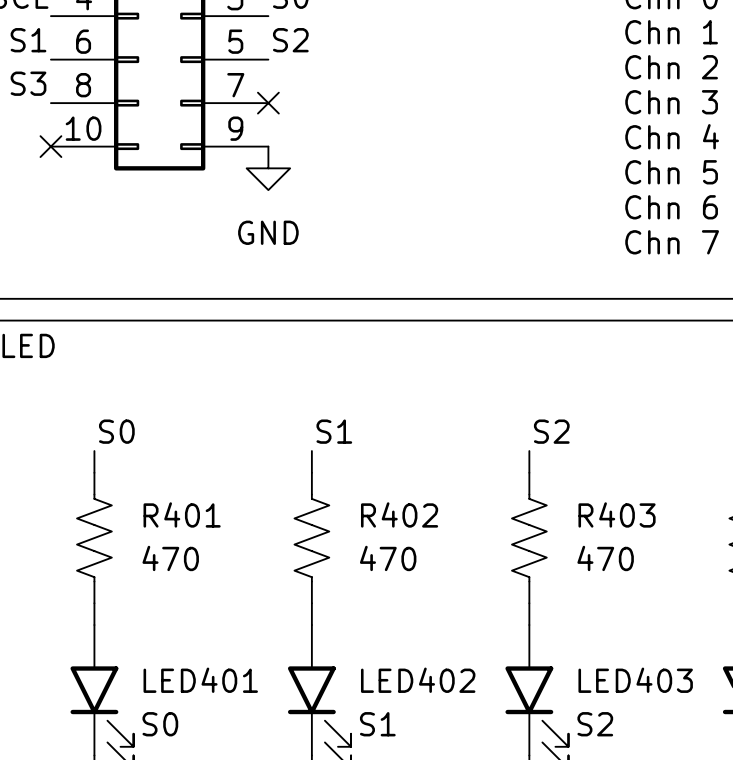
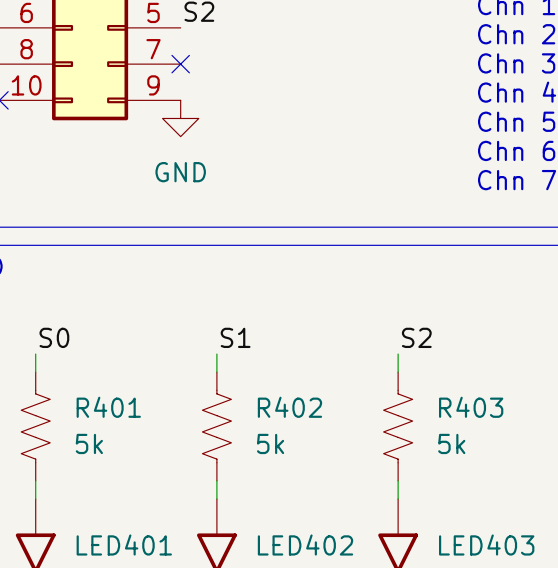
R401 value: 470 (170, 558) -> 5k (89, 443)
R402 value: 470 (388, 558) -> 5k (270, 443)
R403 value: 470 (605, 558) -> 5k (451, 443)

